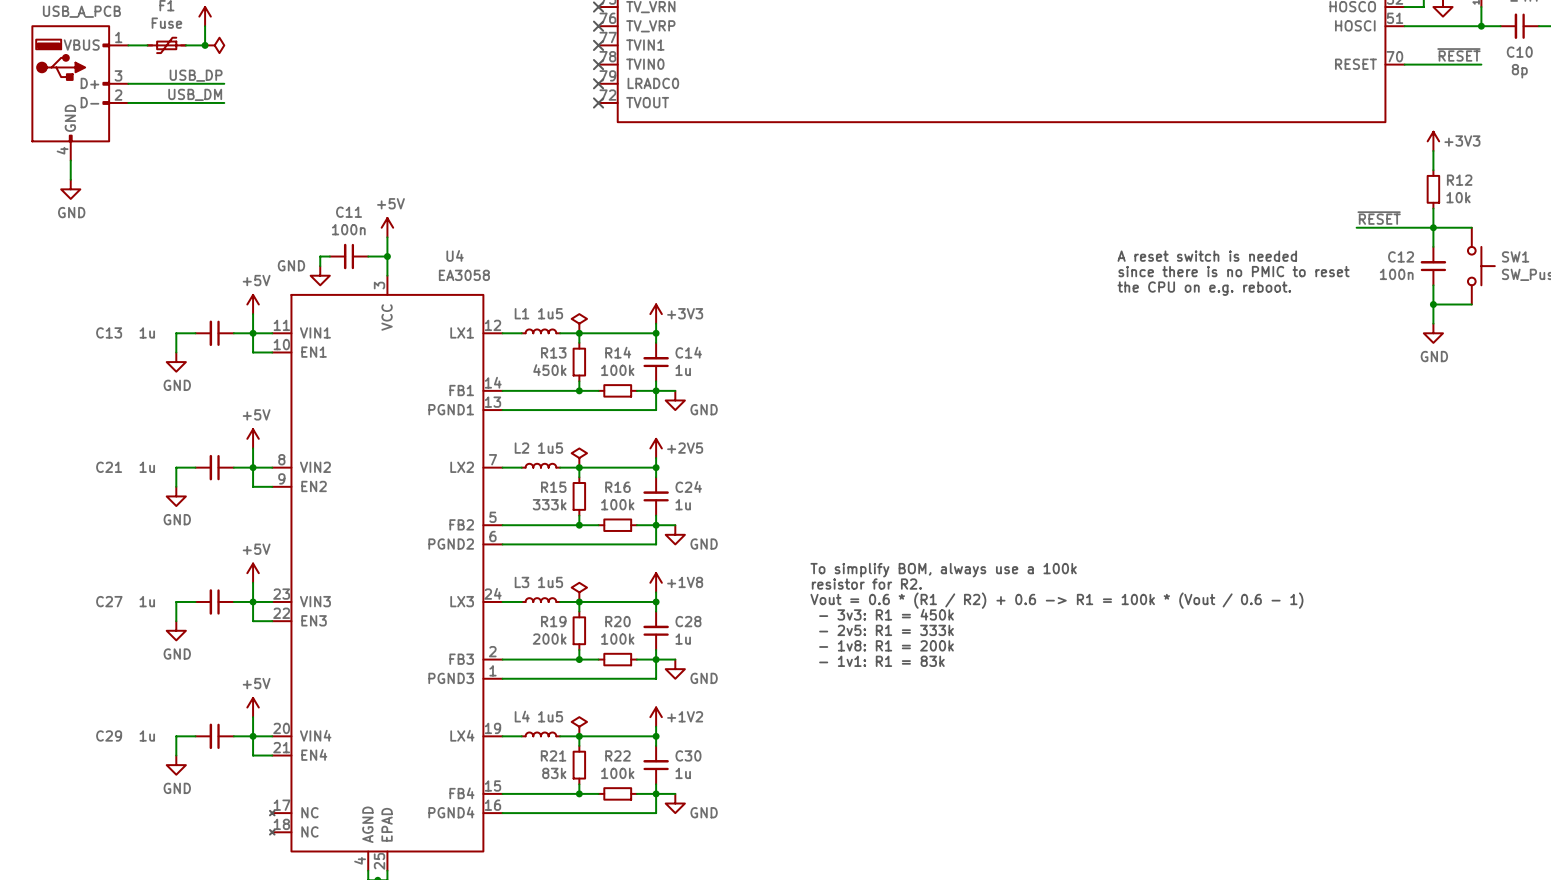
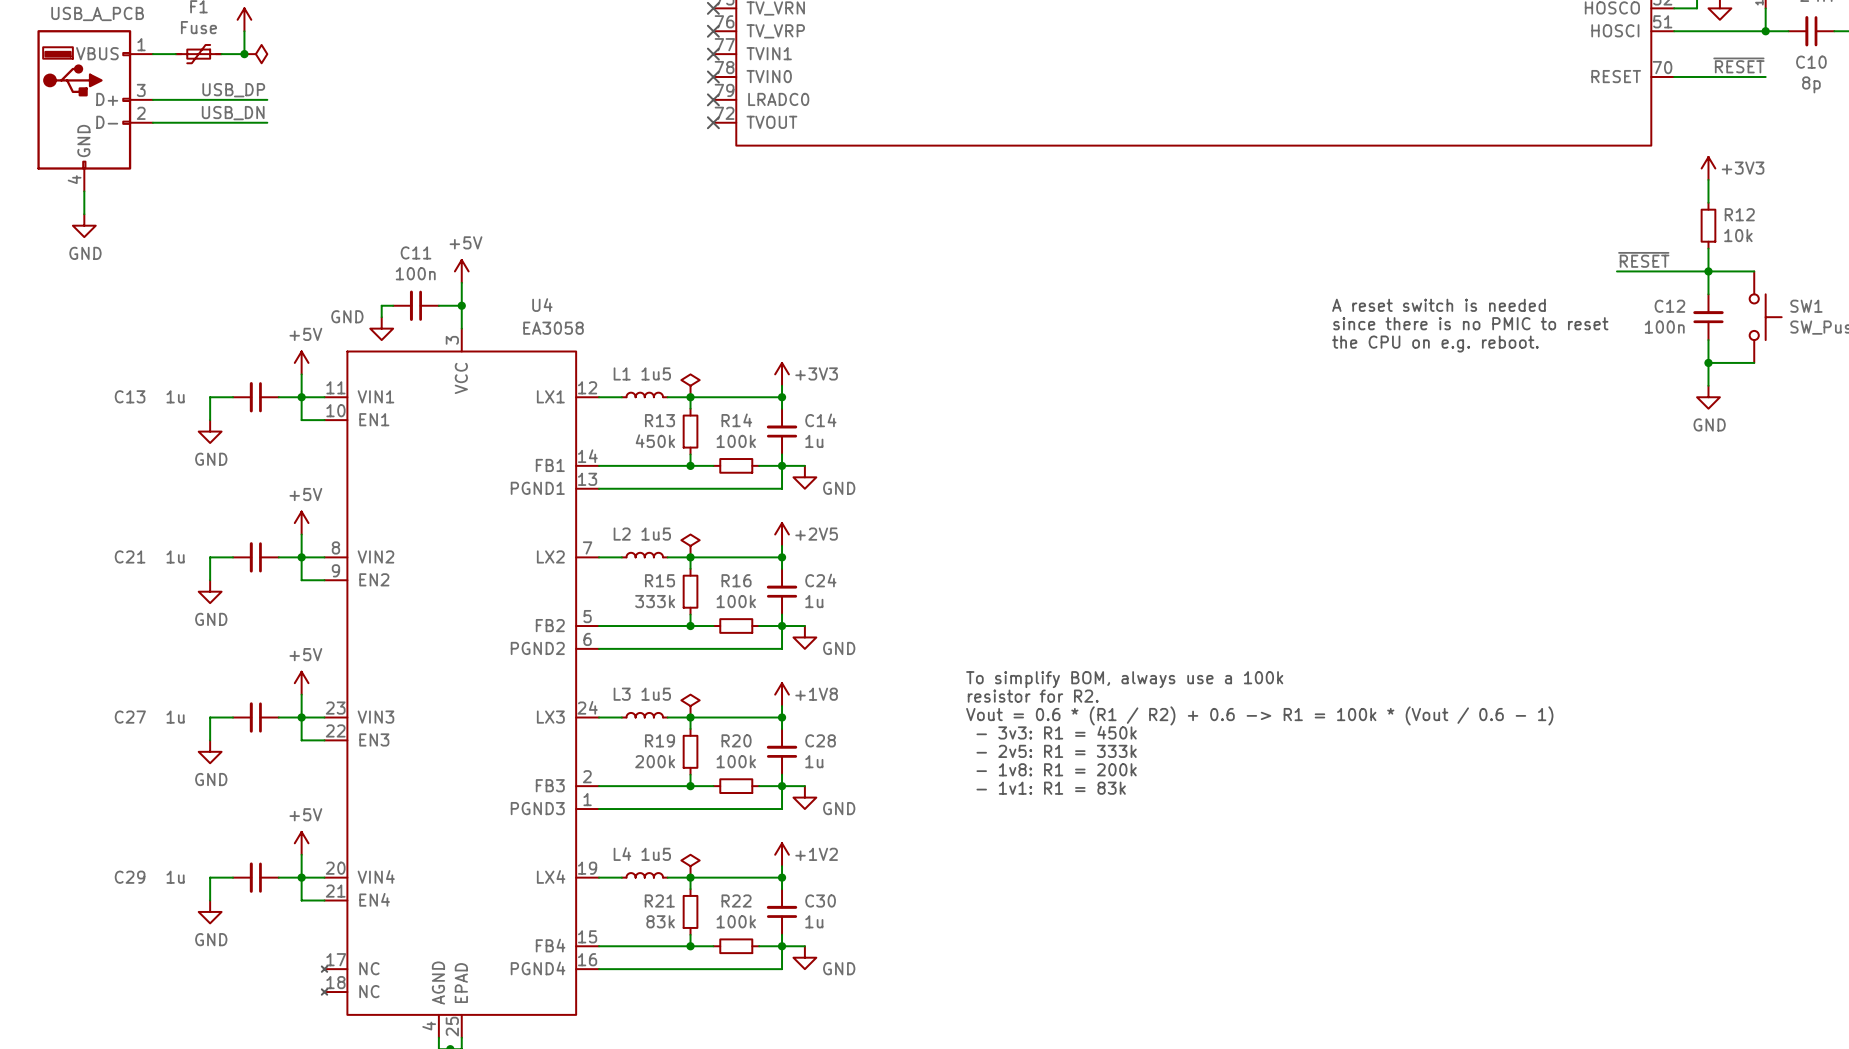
label: USB_DM (195, 94) -> USB_DN (233, 113)

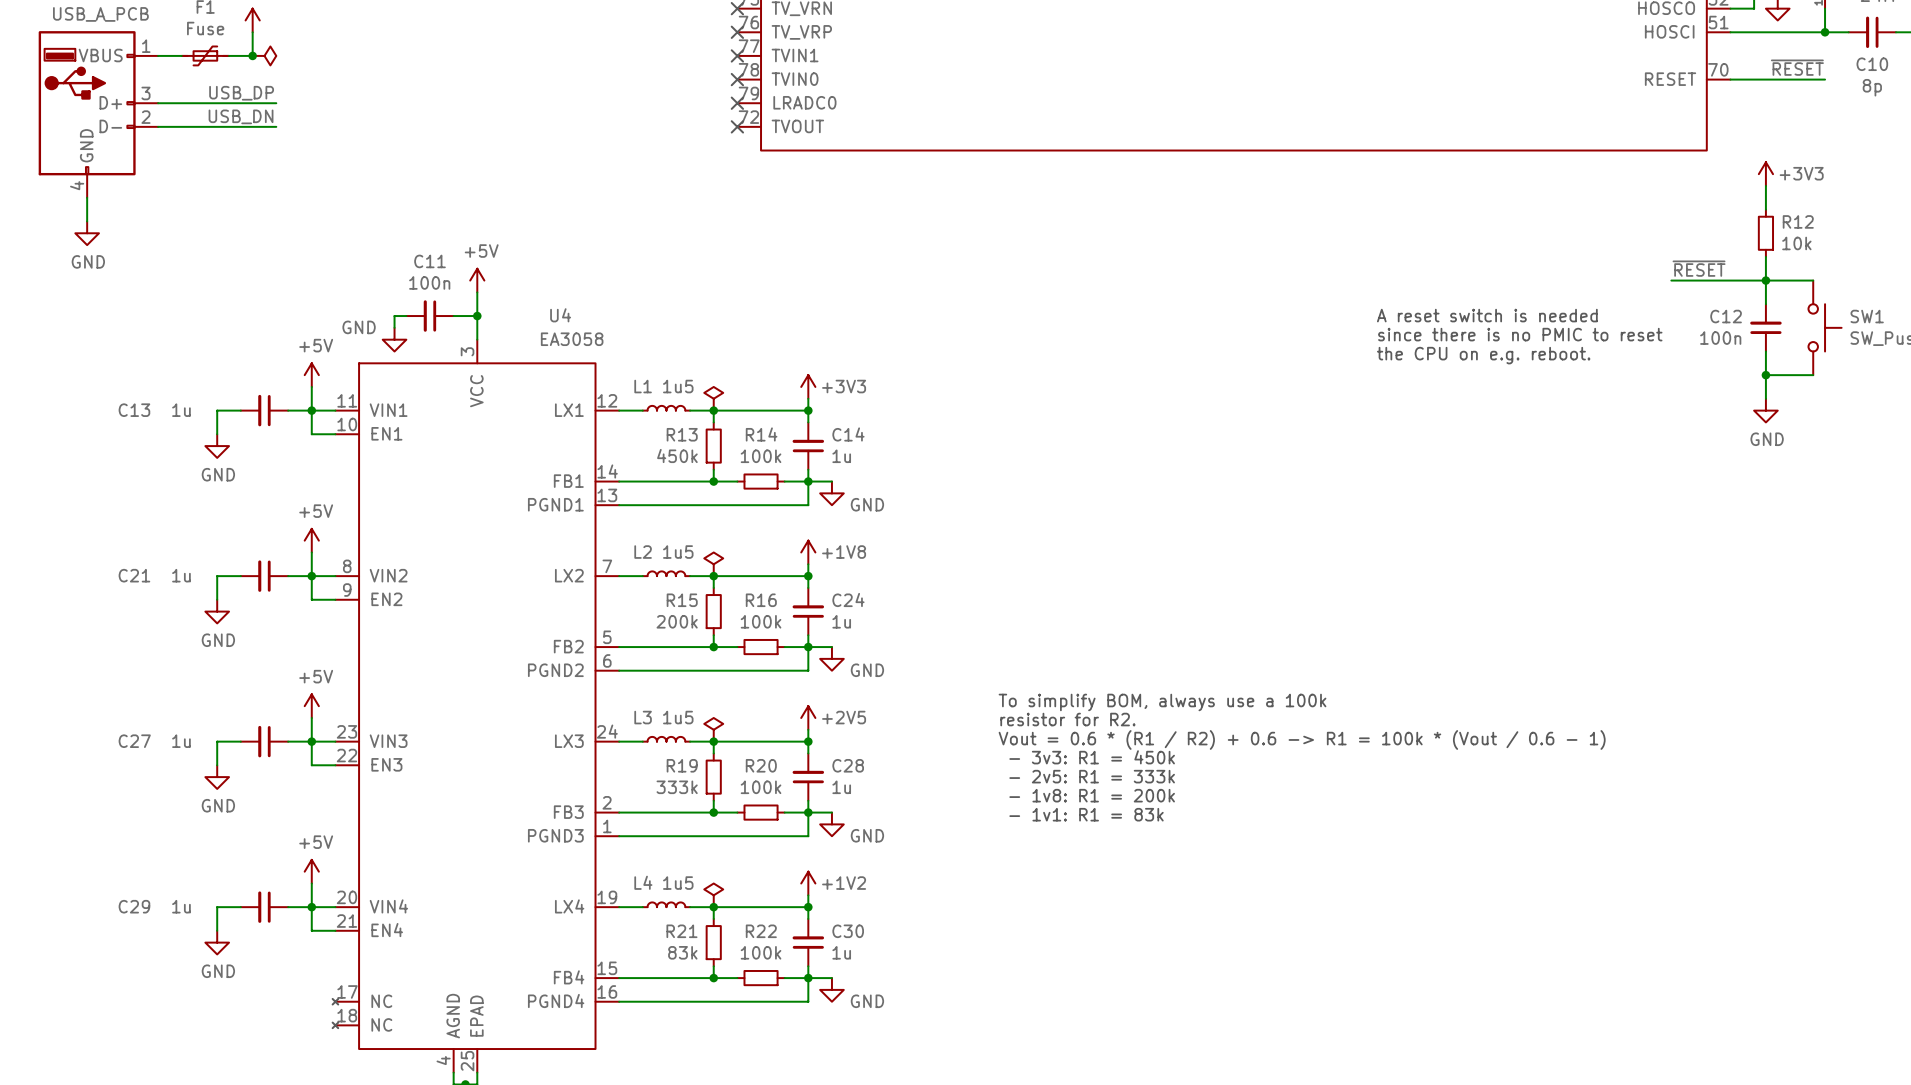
power symbol: +2V5 (782, 534) -> +1V8 (808, 552)
R15 value: 333k (655, 601) -> 200k (677, 621)
power symbol: +1V8 (782, 694) -> +2V5 (808, 717)
R19 value: 200k (655, 761) -> 333k (677, 787)

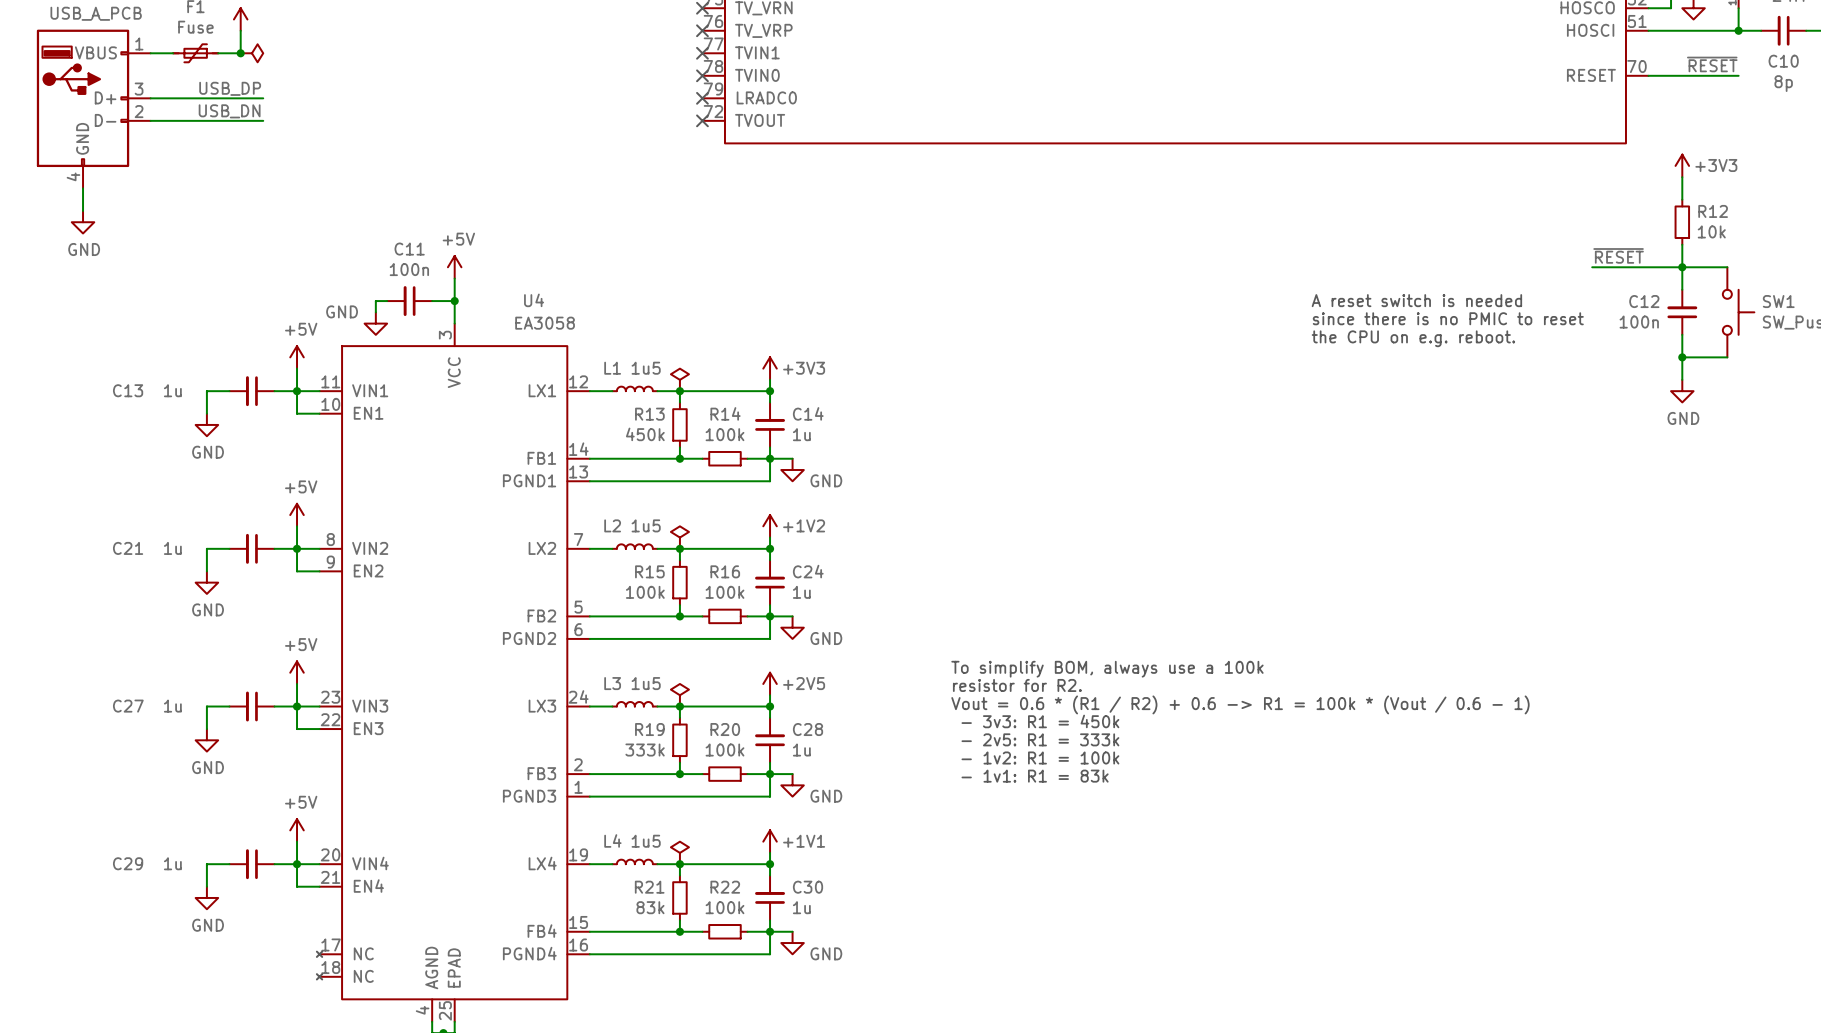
power symbol: +1V8 (808, 552) -> +1V2 (770, 526)
R15 value: 200k (677, 621) -> 100k (645, 592)
text: - 1v8: R1 = 200k (1092, 795) -> - 1v2: R1 = 100k (1040, 757)
power symbol: +1V2 (808, 883) -> +1V1 (770, 841)

